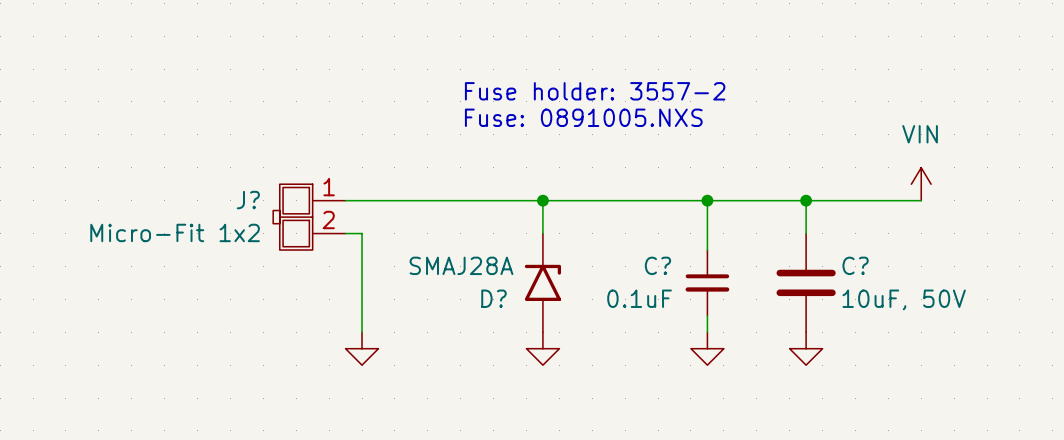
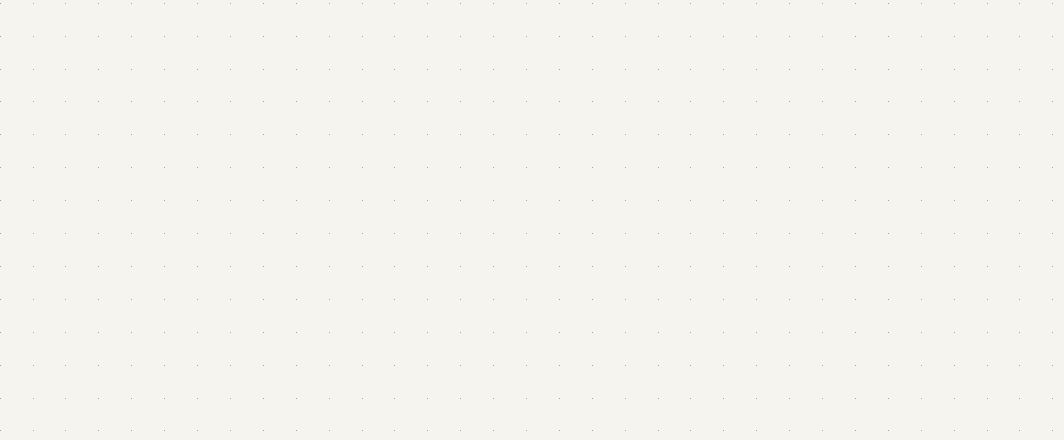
text: Fuse holder: 3557-2 (595, 91) -> none
text: Fuse: 0891005.NXS (583, 117) -> none
power symbol: VIN (921, 184) -> none
wire: (345, 200) (921, 200) -> none
wire: (542, 200) (542, 233) -> none
junction: (542, 200) -> none
wire: (707, 200) (707, 250) -> none
junction: (707, 200) -> none
wire: (806, 200) (806, 233) -> none
junction: (806, 200) -> none
J?: Micro-Fit 1x2 (309, 217) -> none
wire: (345, 233) (362, 233) (362, 332) -> none
D?: SMAJ28A (542, 282) -> none
C?: 0.1uF (707, 282) -> none
C?: 10uF, 50V (806, 282) -> none
wire: (707, 315) (707, 332) -> none
power symbol: (362, 348) -> none
power symbol: (542, 348) -> none
power symbol: (707, 348) -> none
power symbol: (806, 348) -> none

